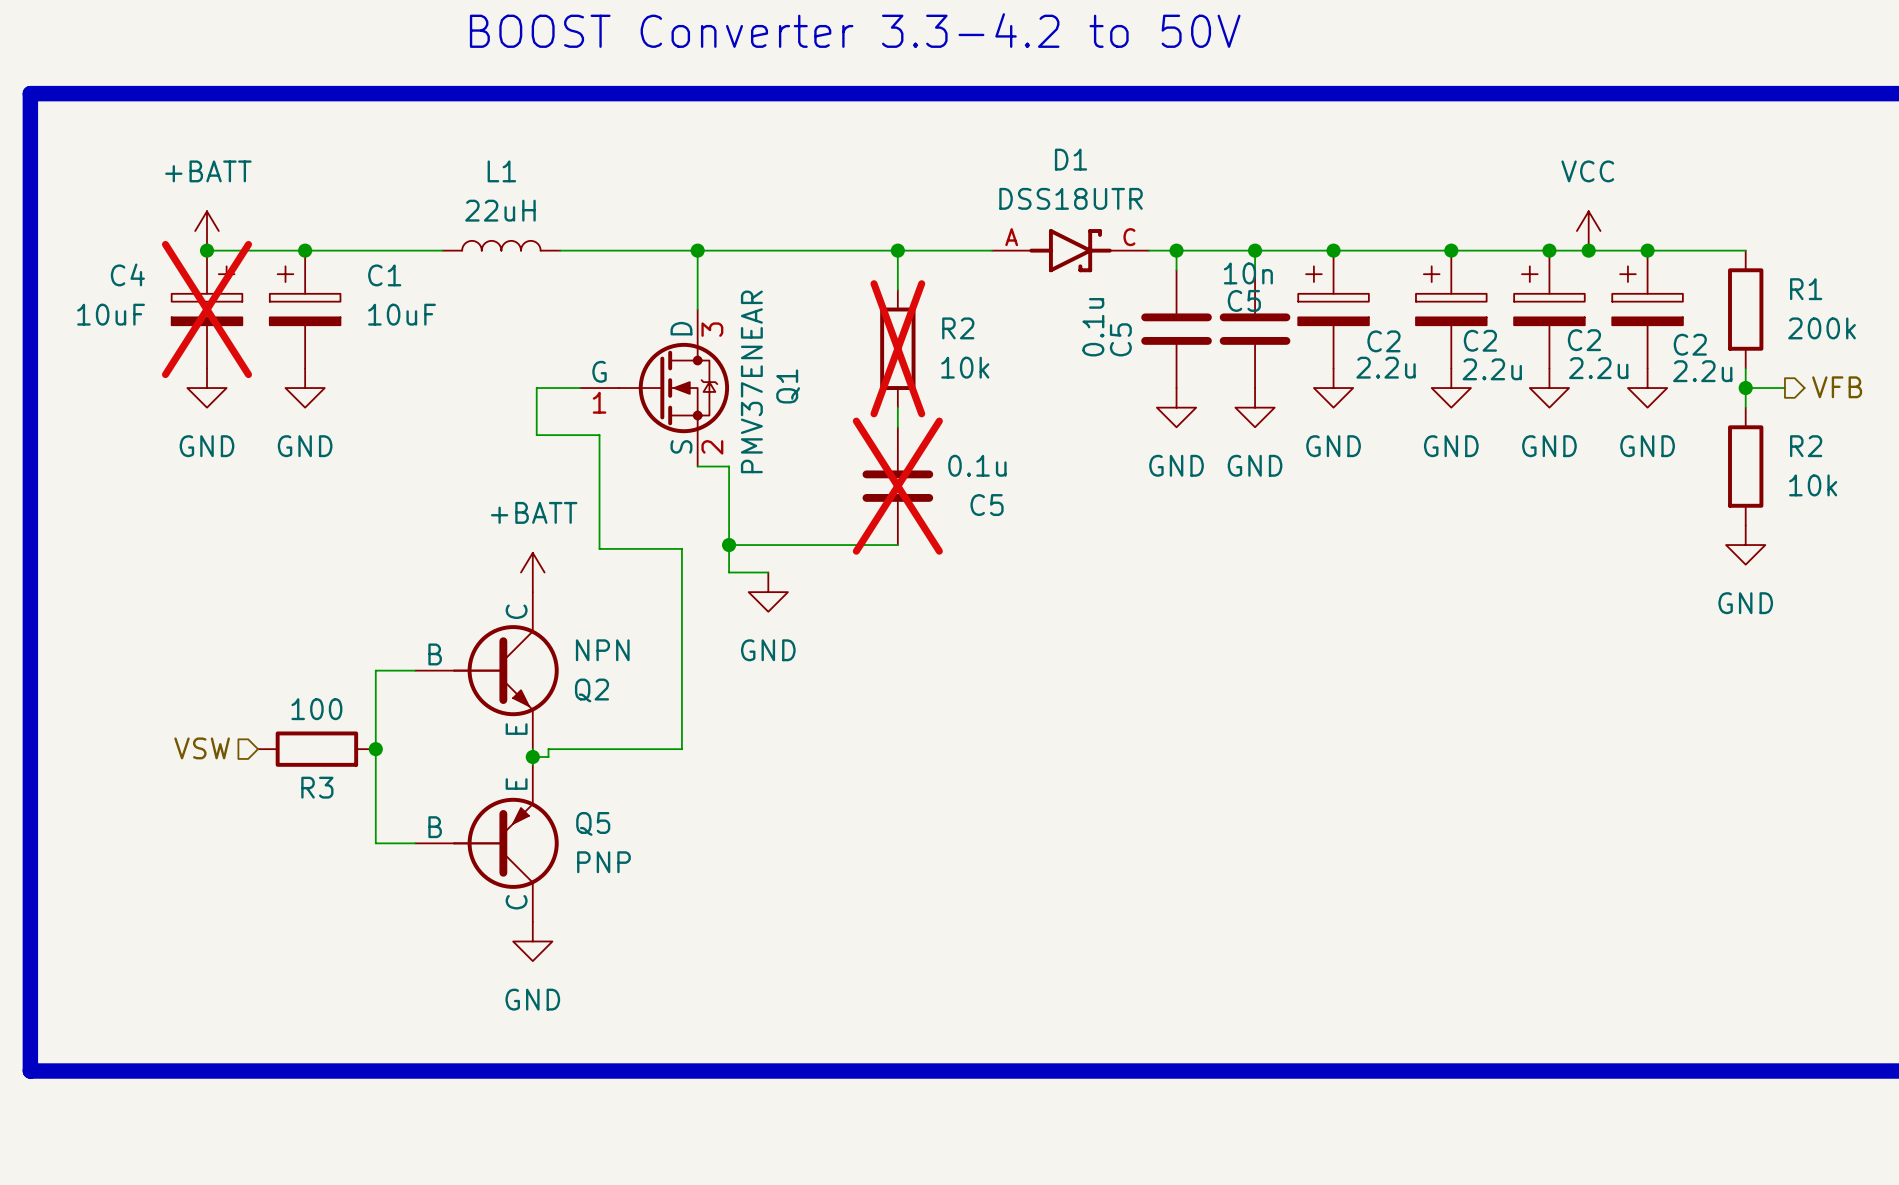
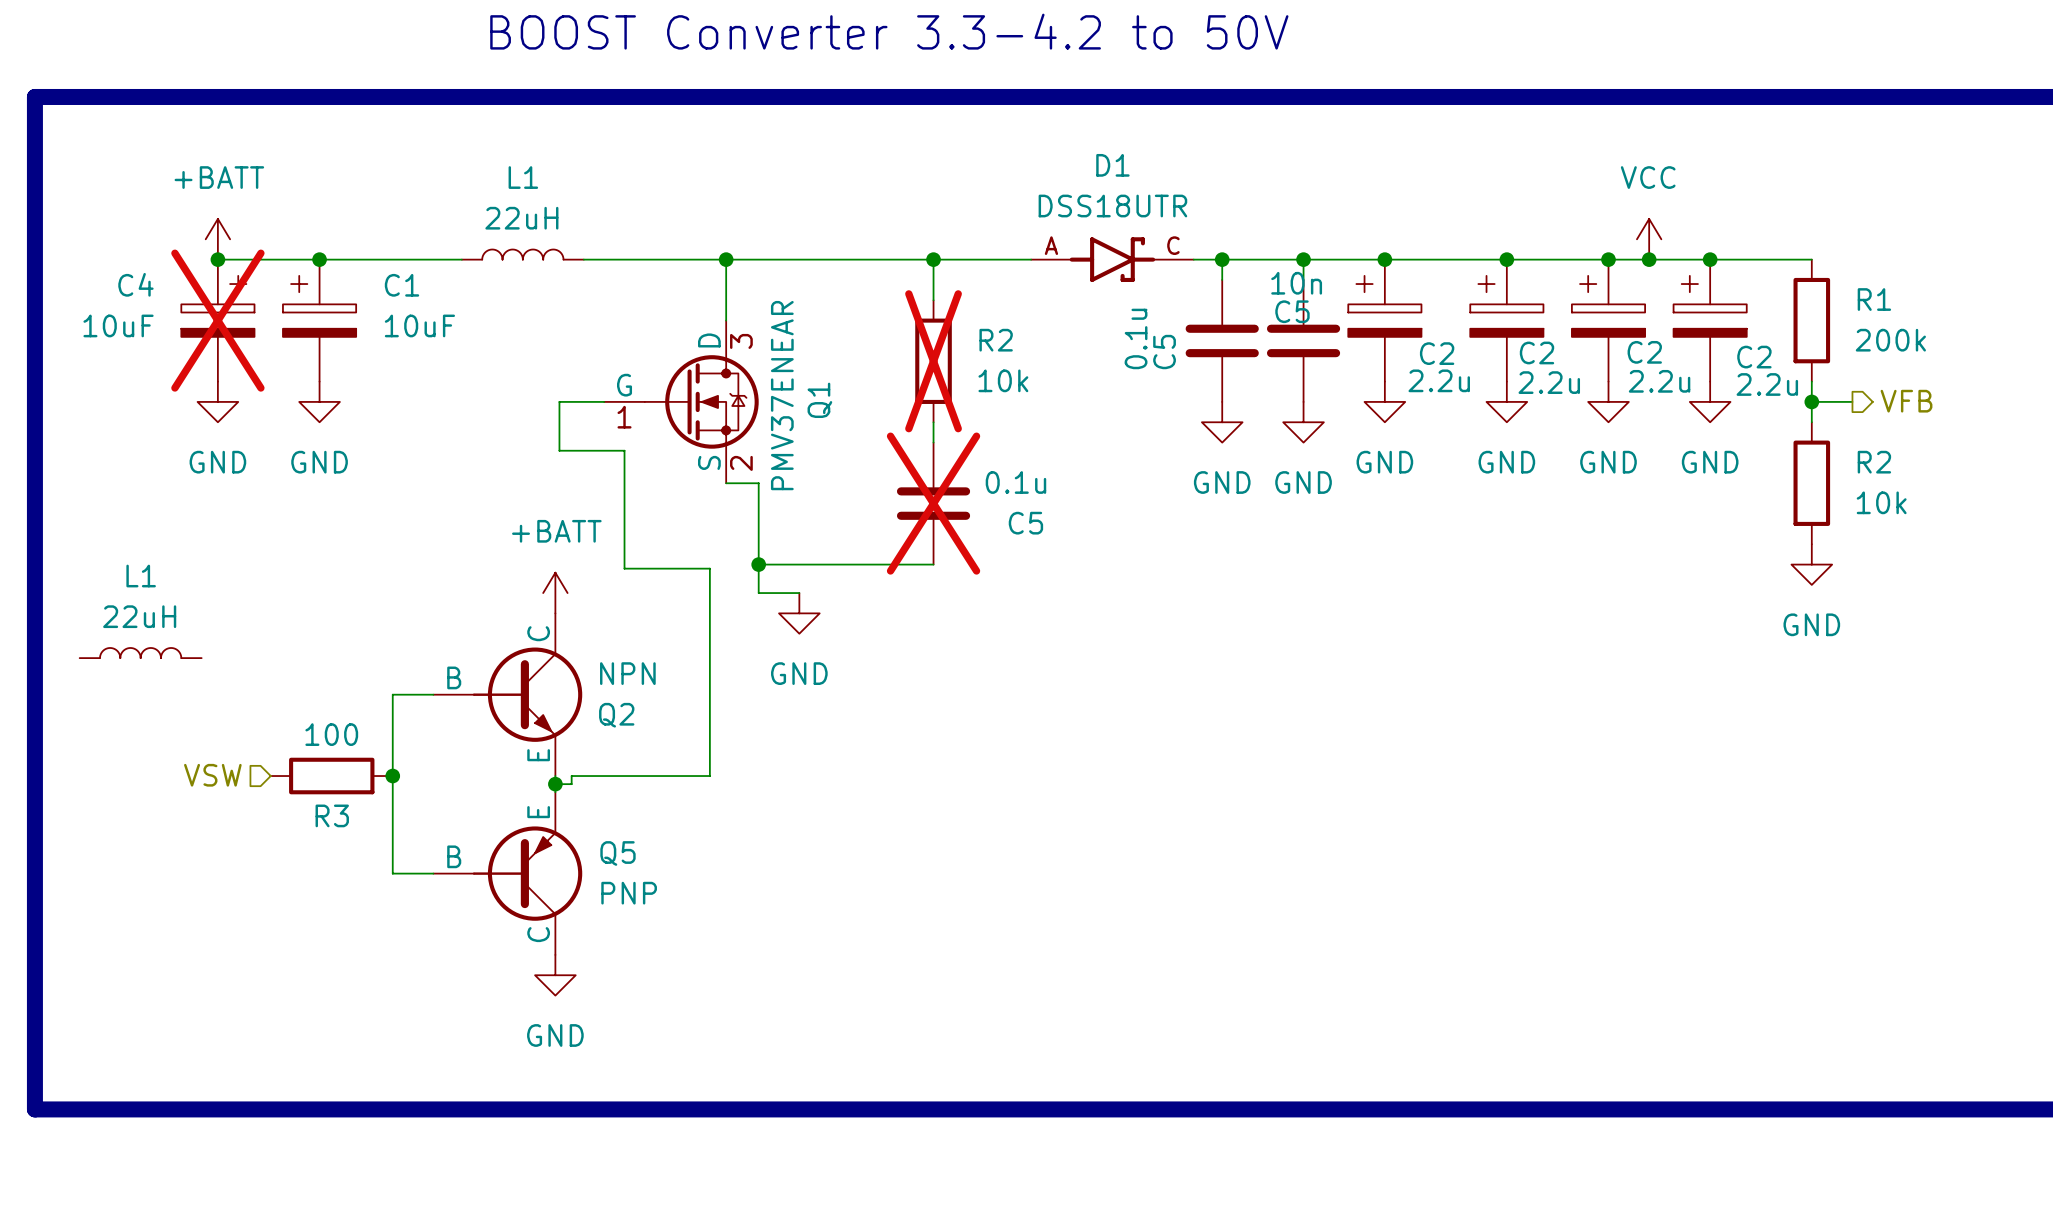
L1: none -> 22uH (140, 653)

